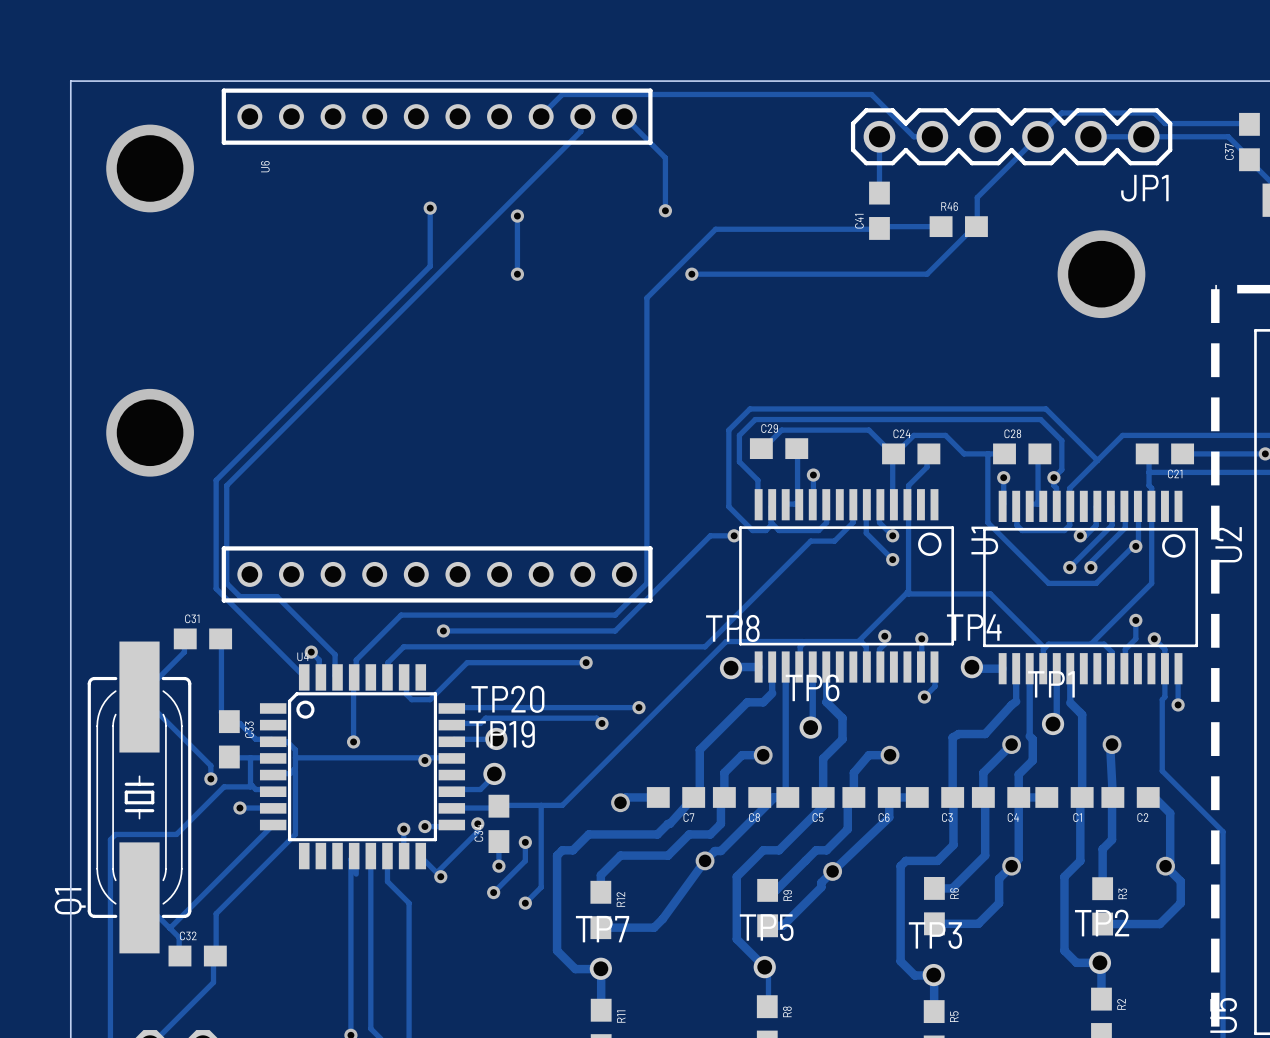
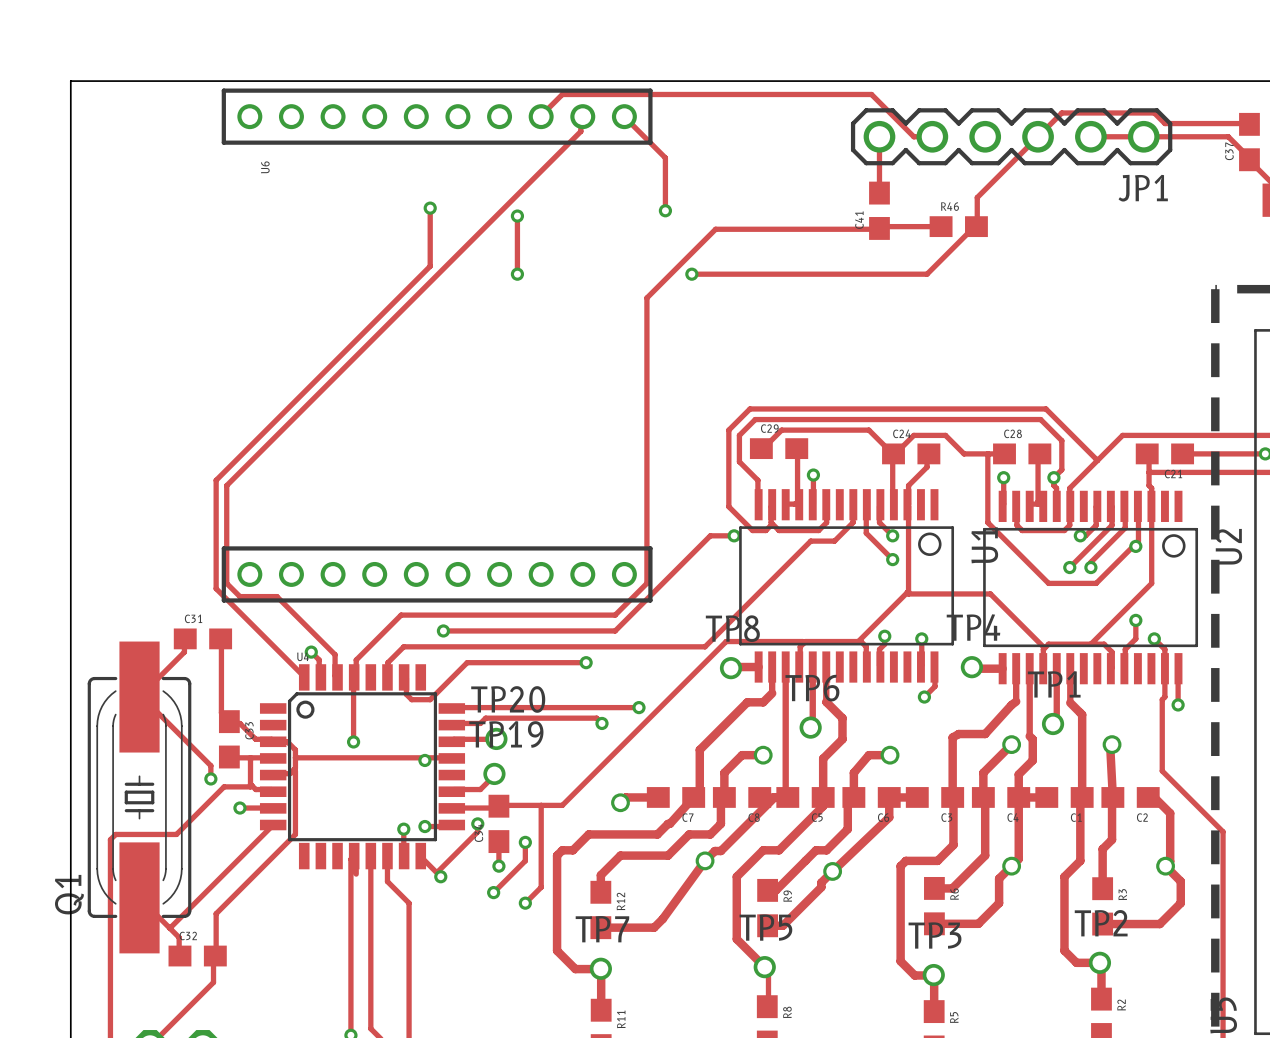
via: (150, 168) -> none
via: (1101, 274) -> none
via: (150, 432) -> none

